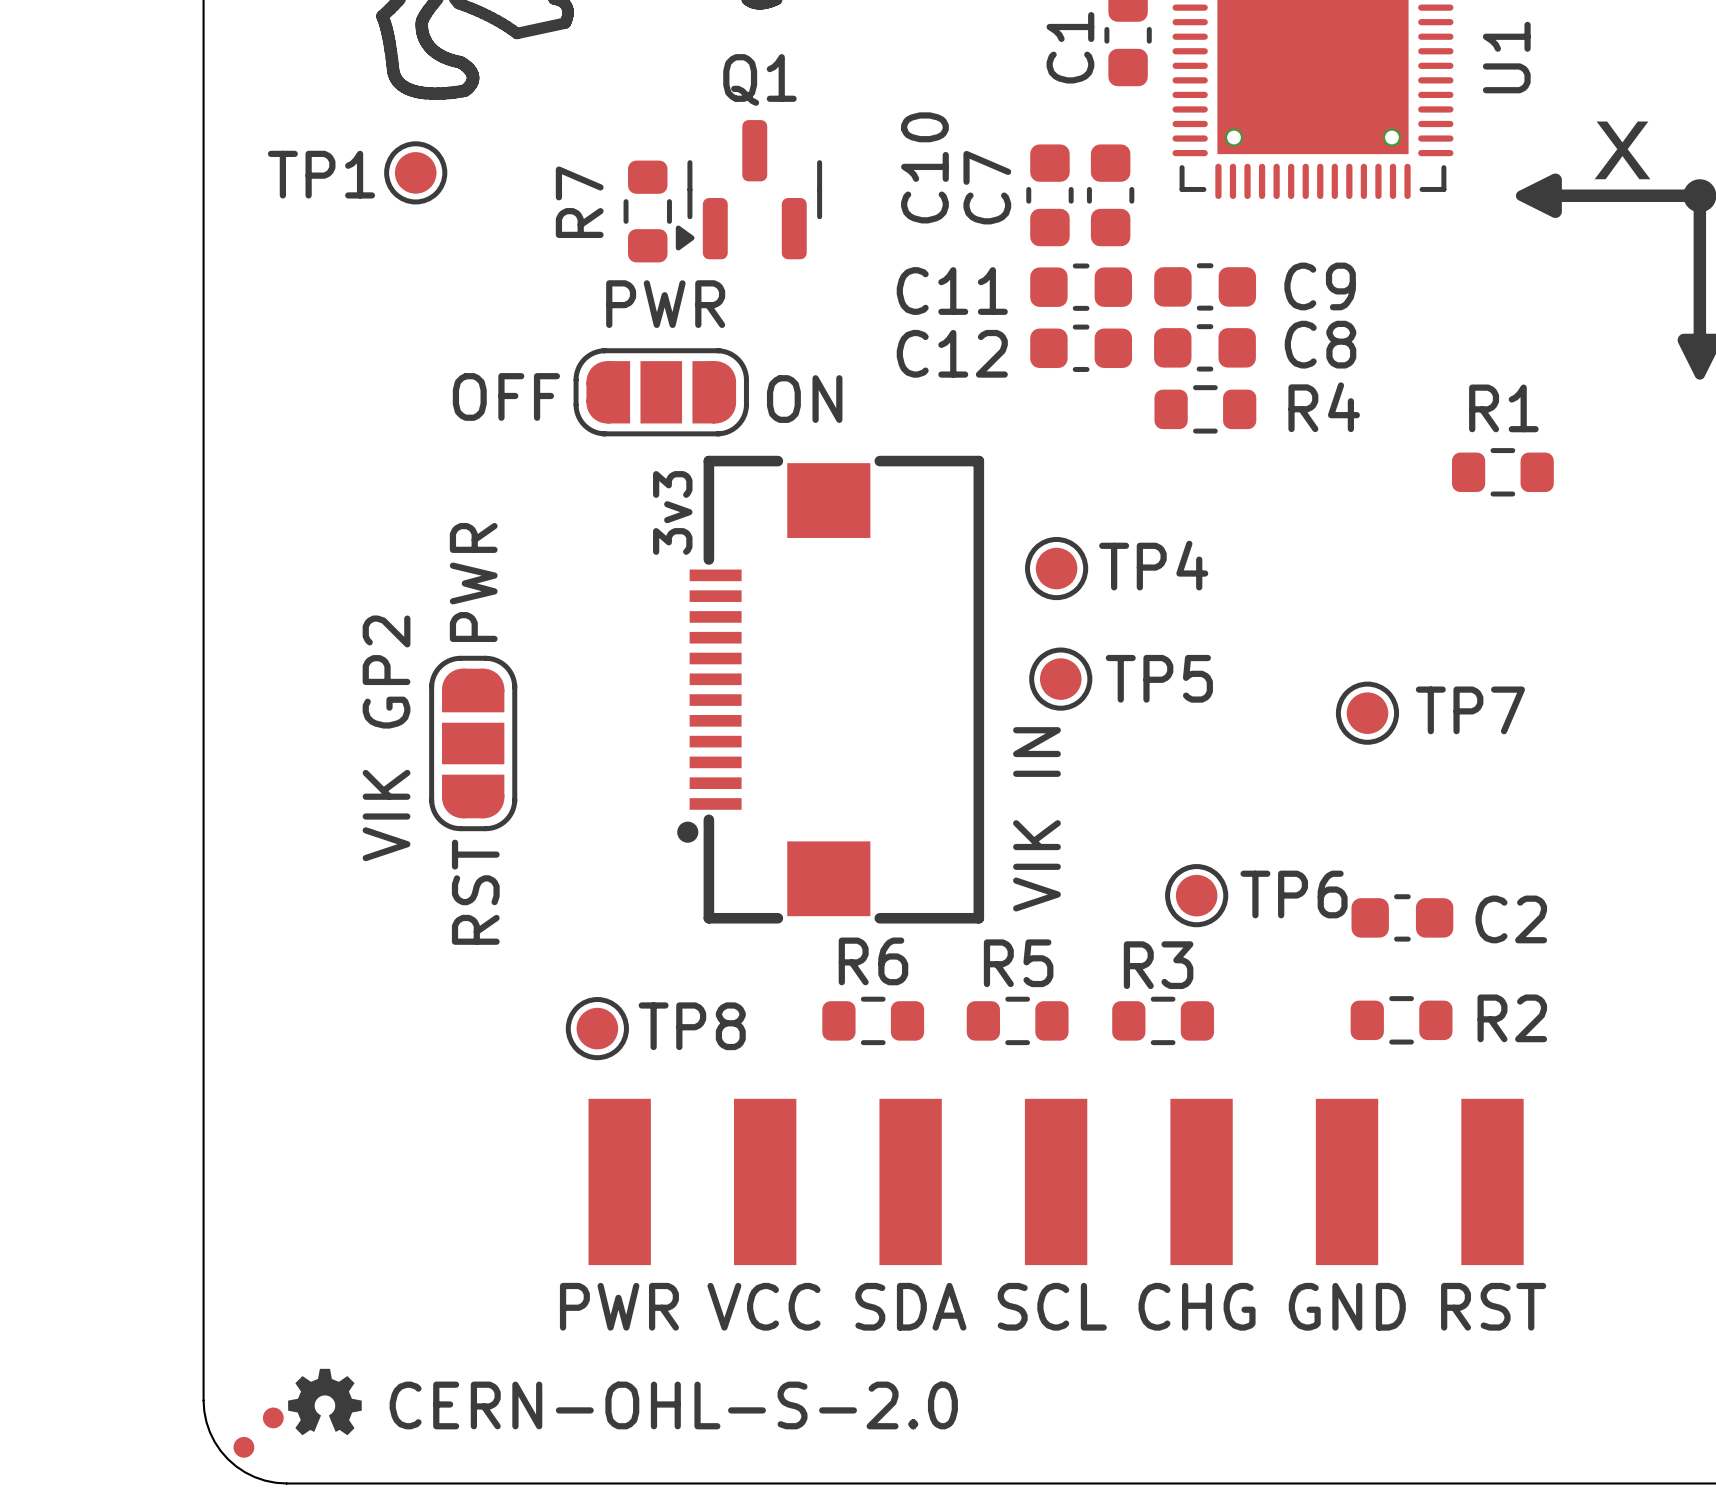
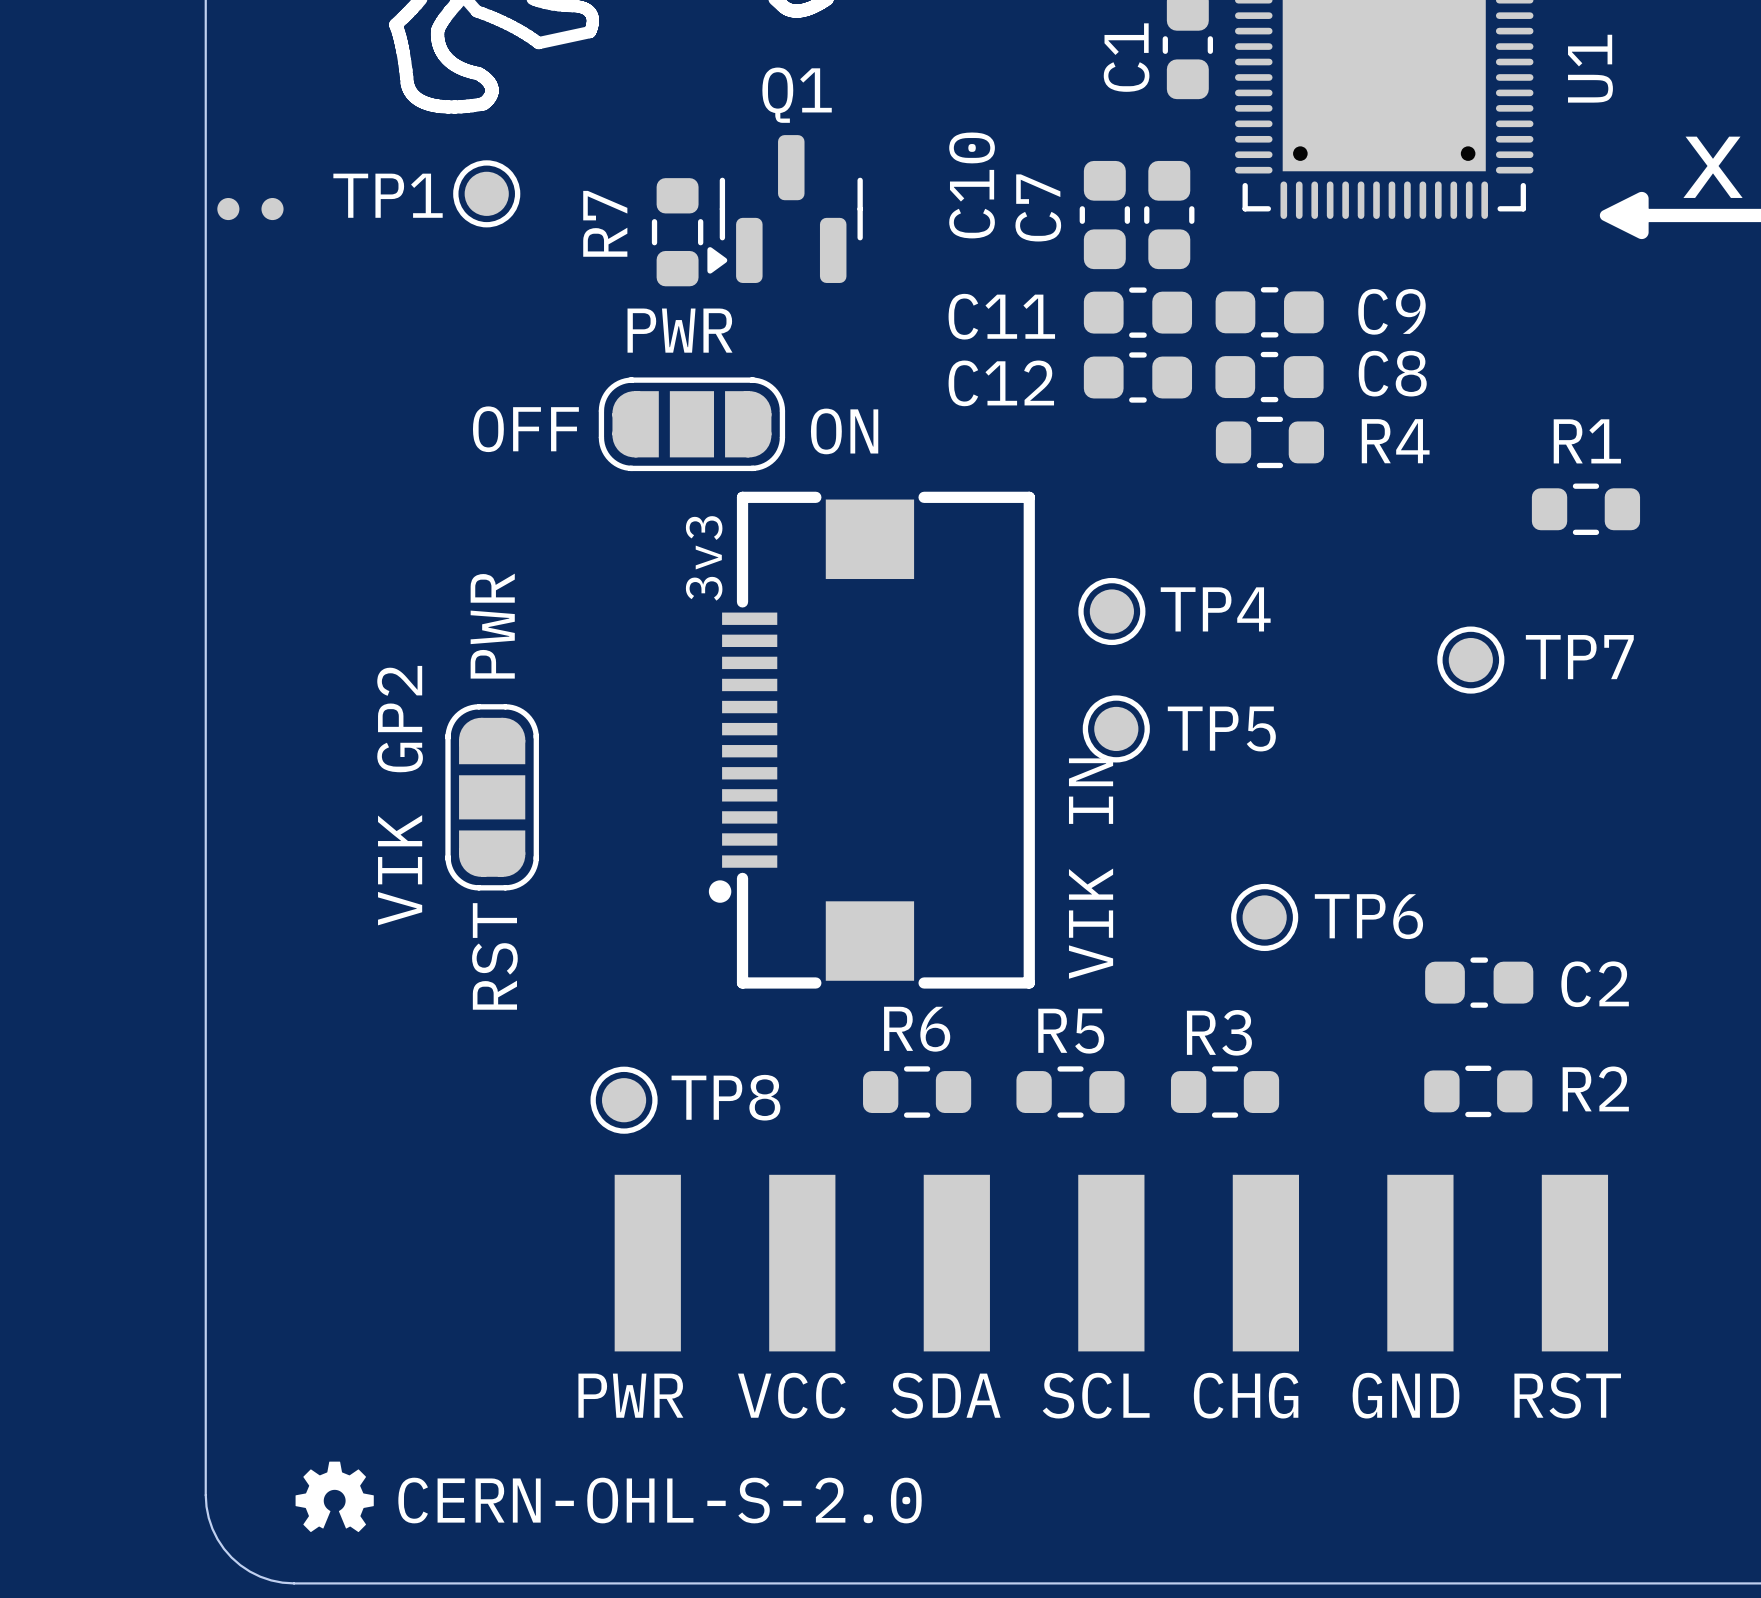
TP1 position: (415, 172) -> (486, 193)
part: none -> (250, 209)
TP7 position: (1367, 713) -> (1470, 660)
TP6 position: (1196, 895) -> (1264, 917)
part: (258, 1432) -> none

